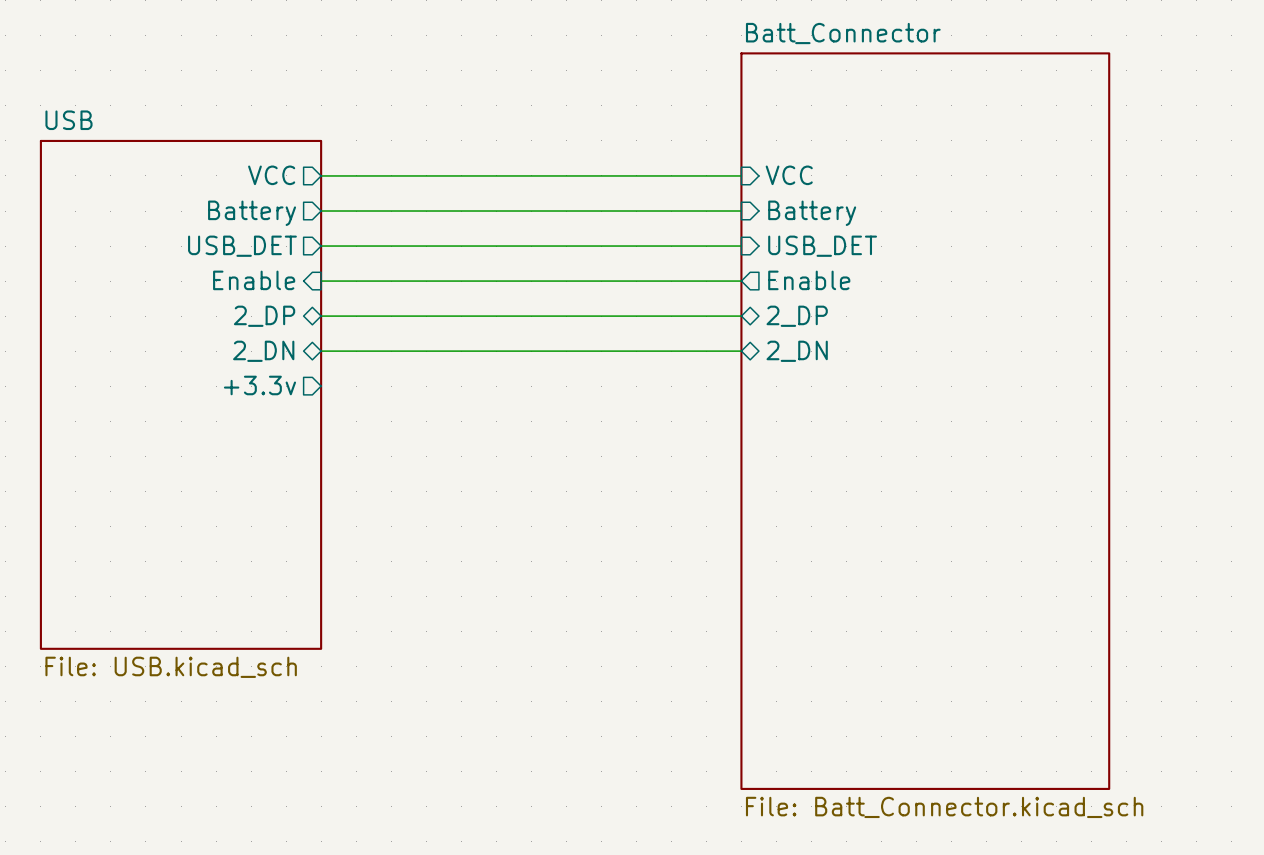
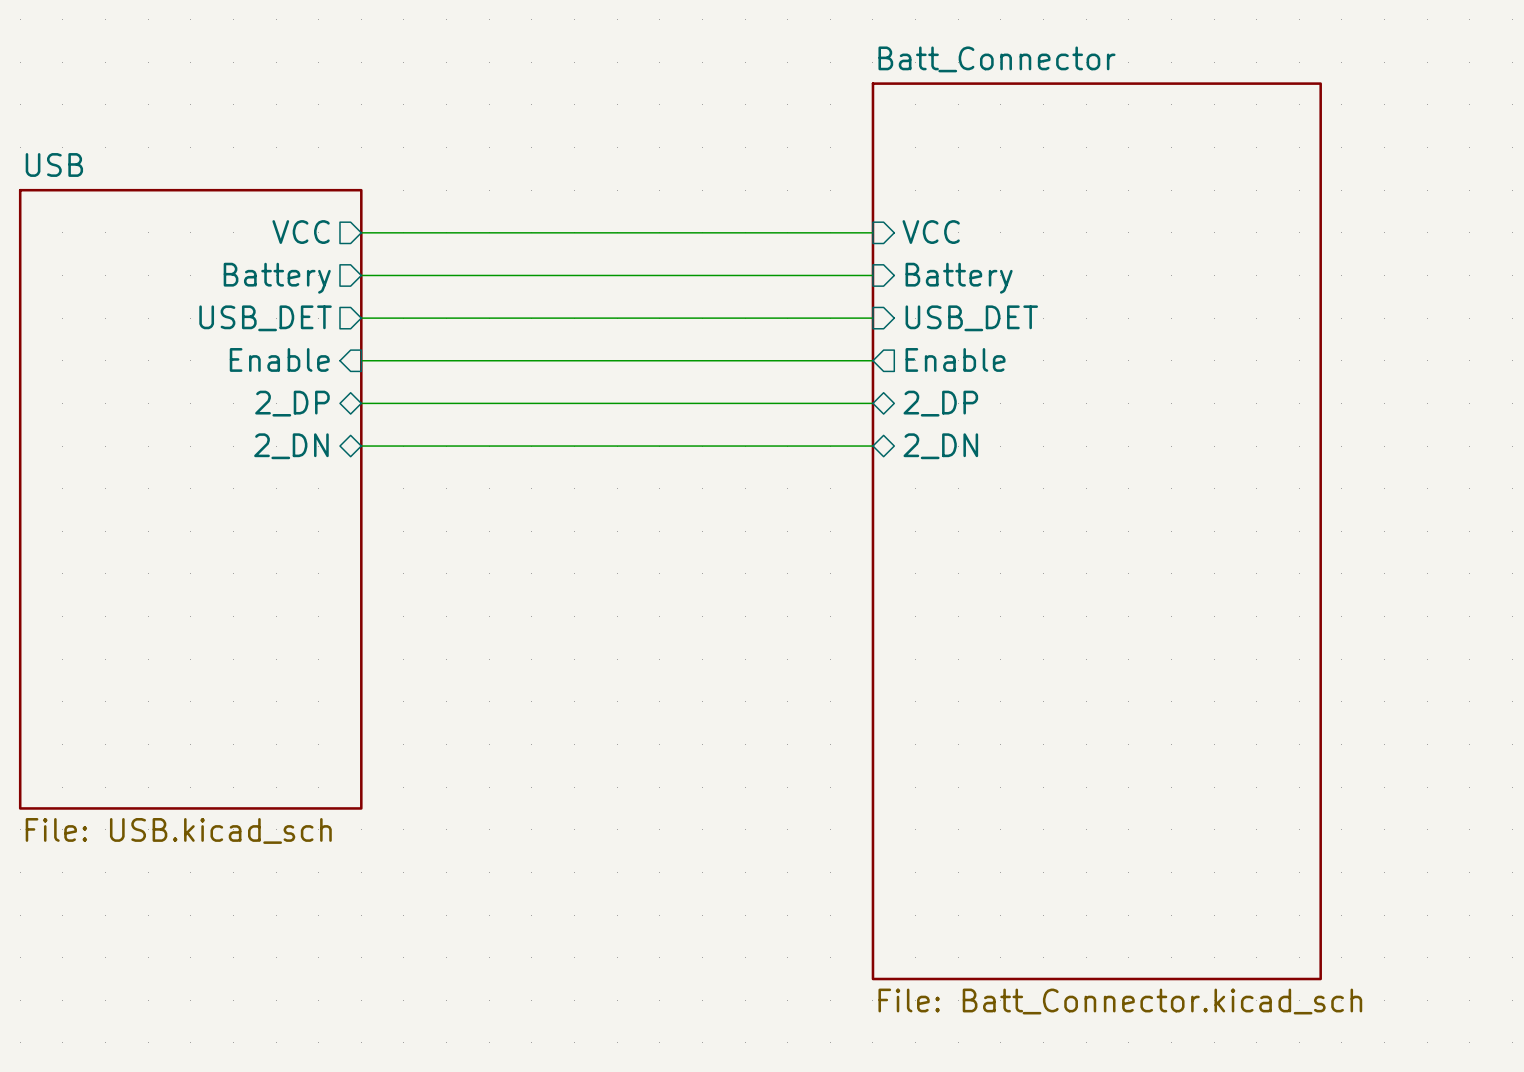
sheet pin: +3.3v (259, 385) -> none

